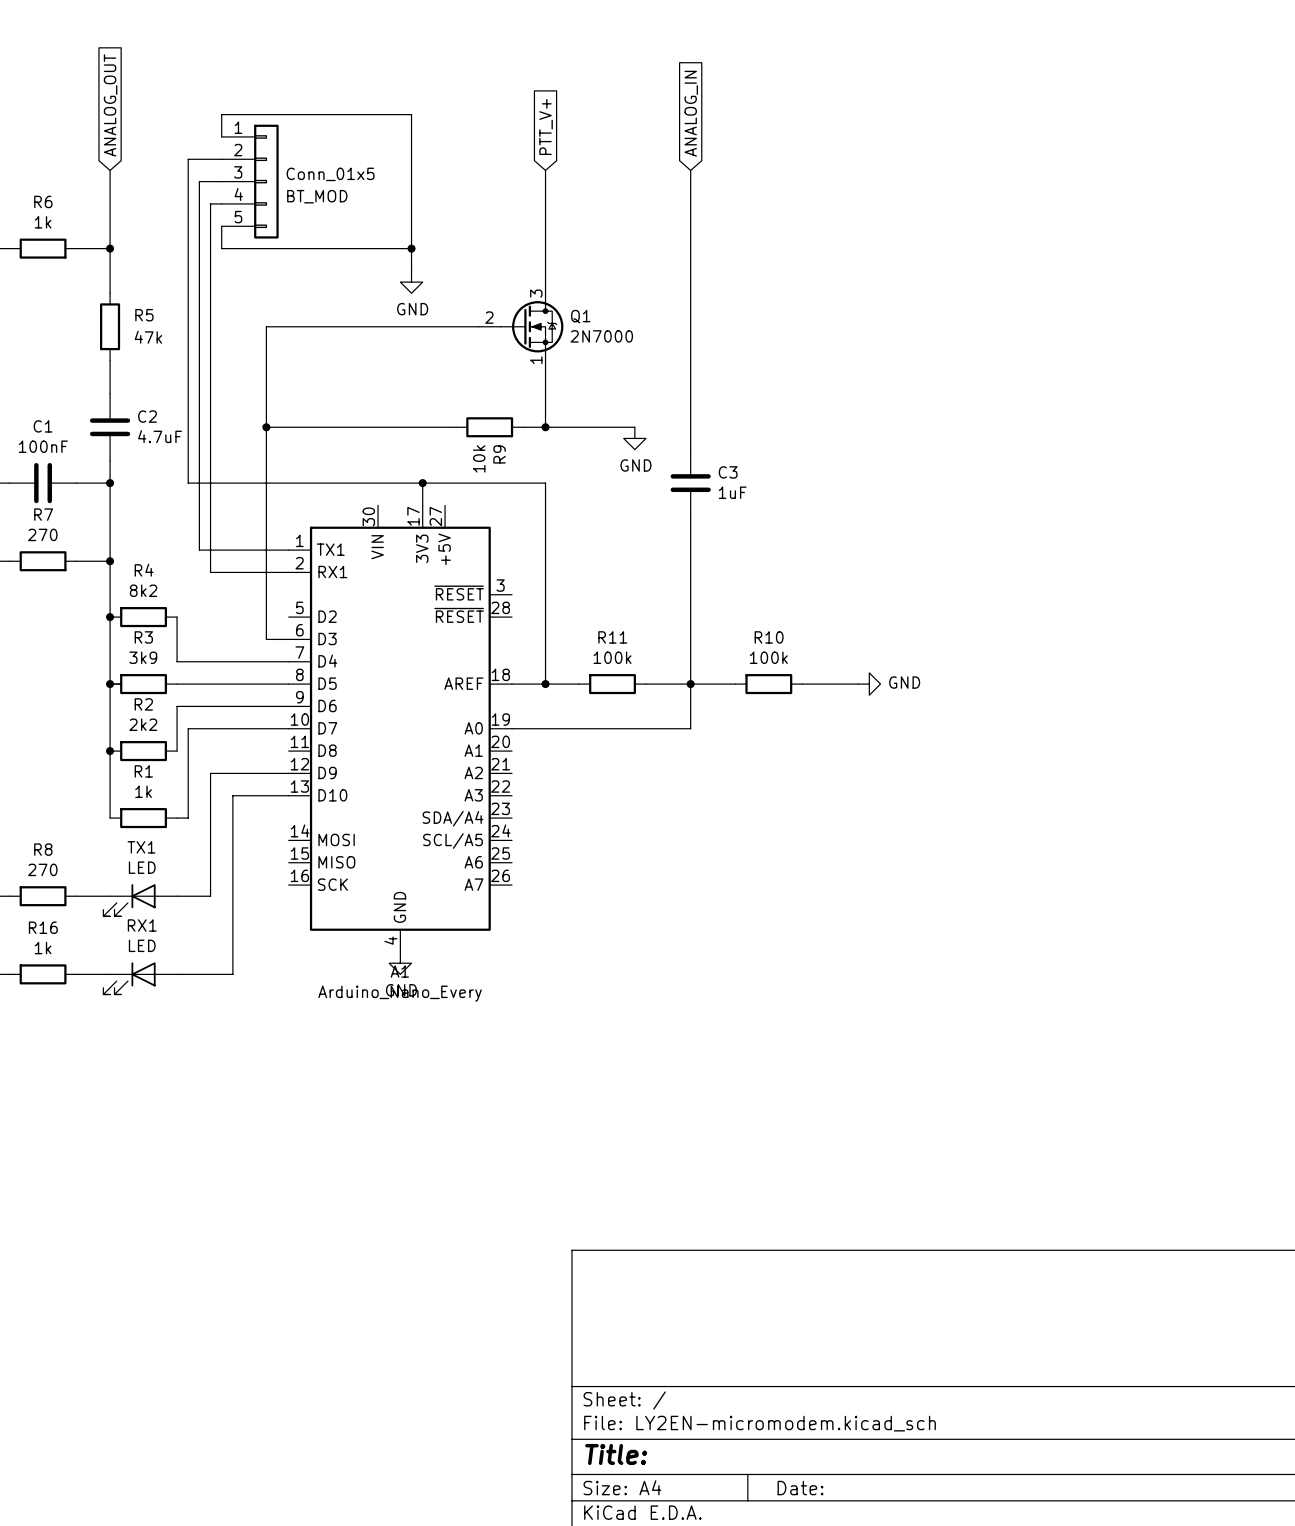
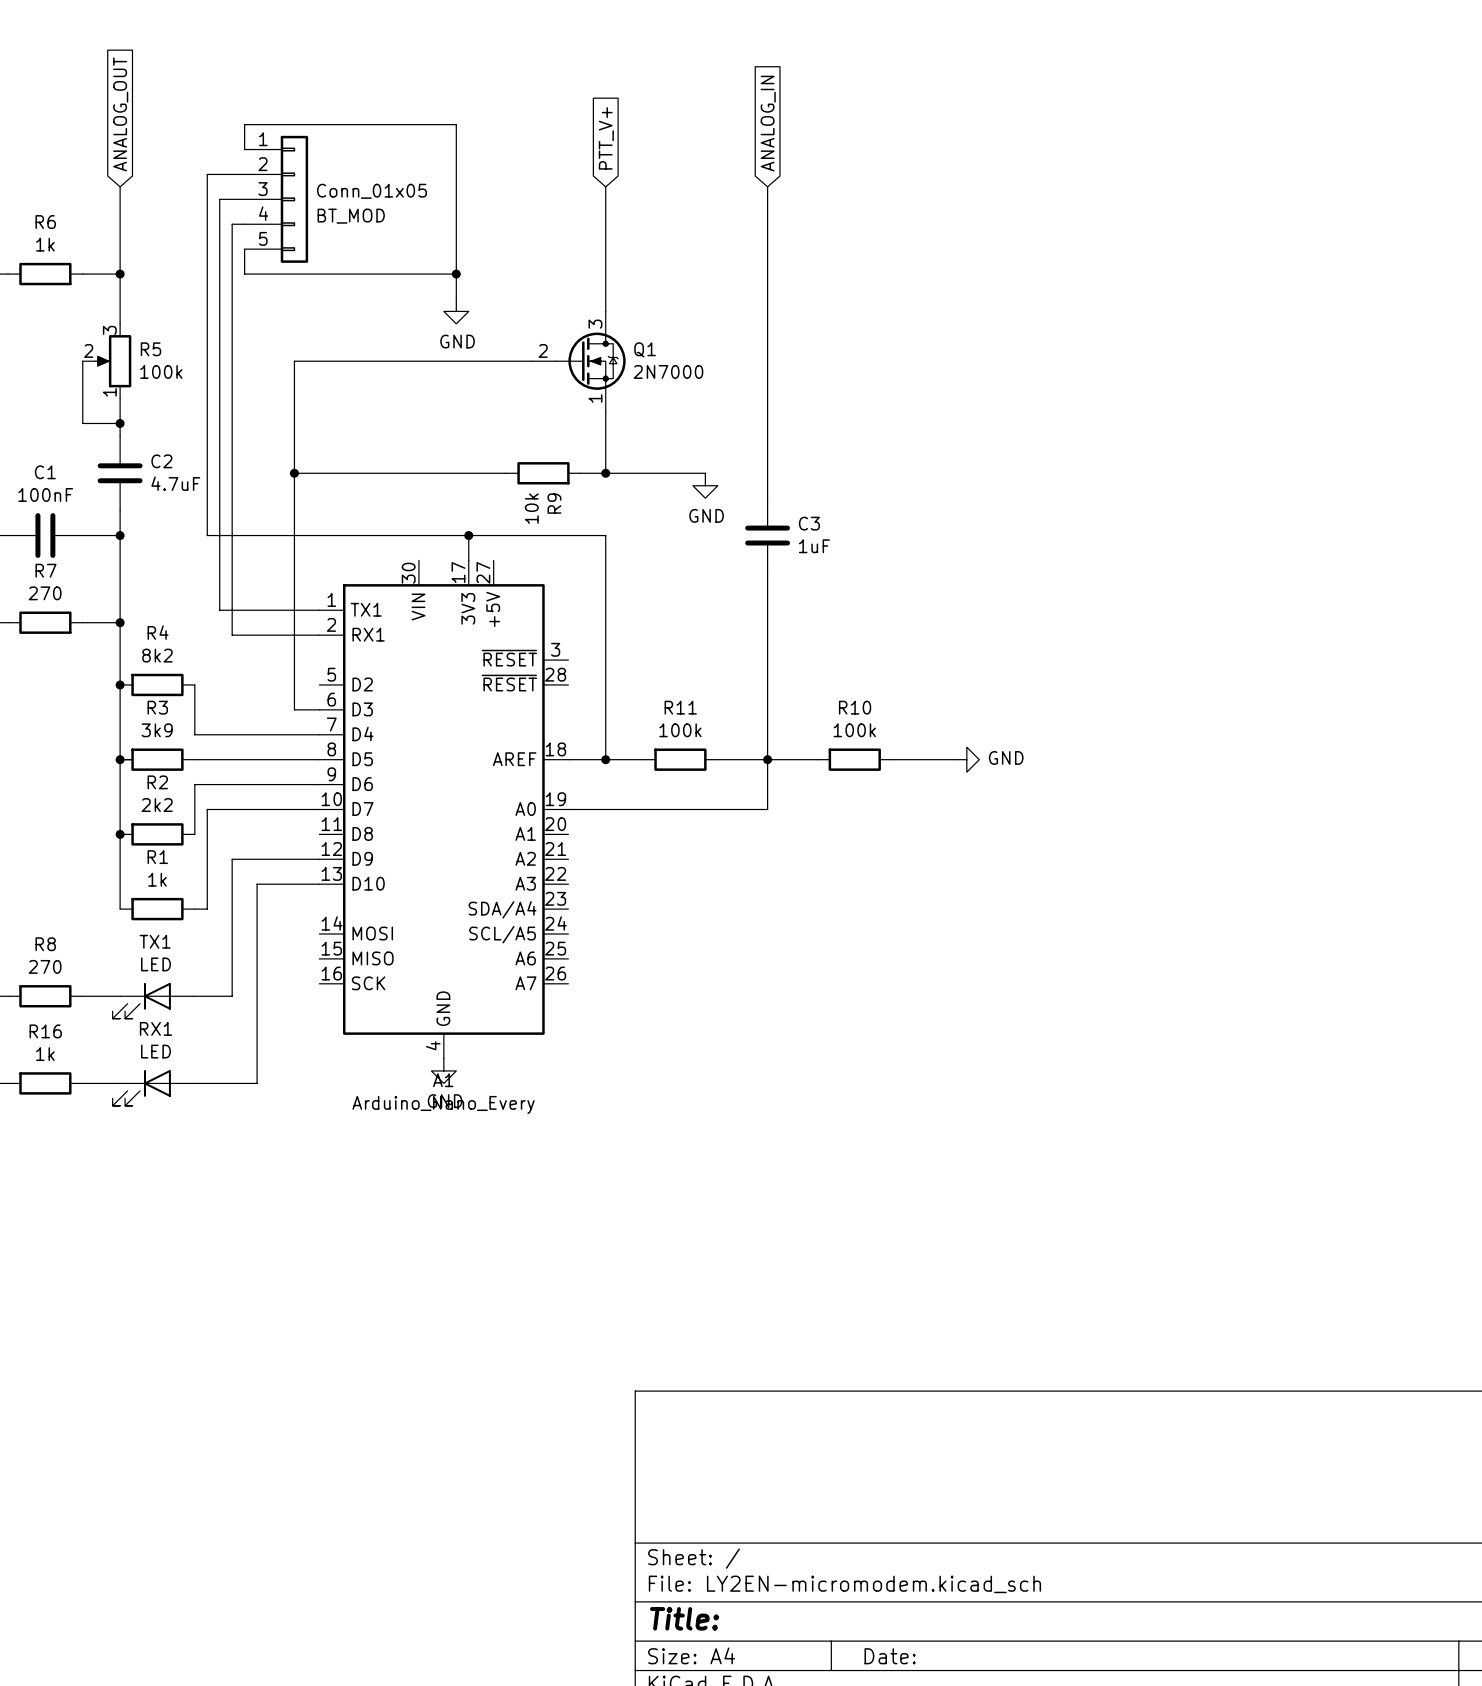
Conn_01x5 name: Conn_01x5 (330, 174) -> Conn_01x05 (371, 191)
R5 symbol: [100, 293, 121, 361] -> [82, 323, 132, 399]
wire: none -> (82, 361) (82, 423) (120, 423)
R5 value: 47k (148, 337) -> 100k (161, 371)
junction: none -> (120, 423)

